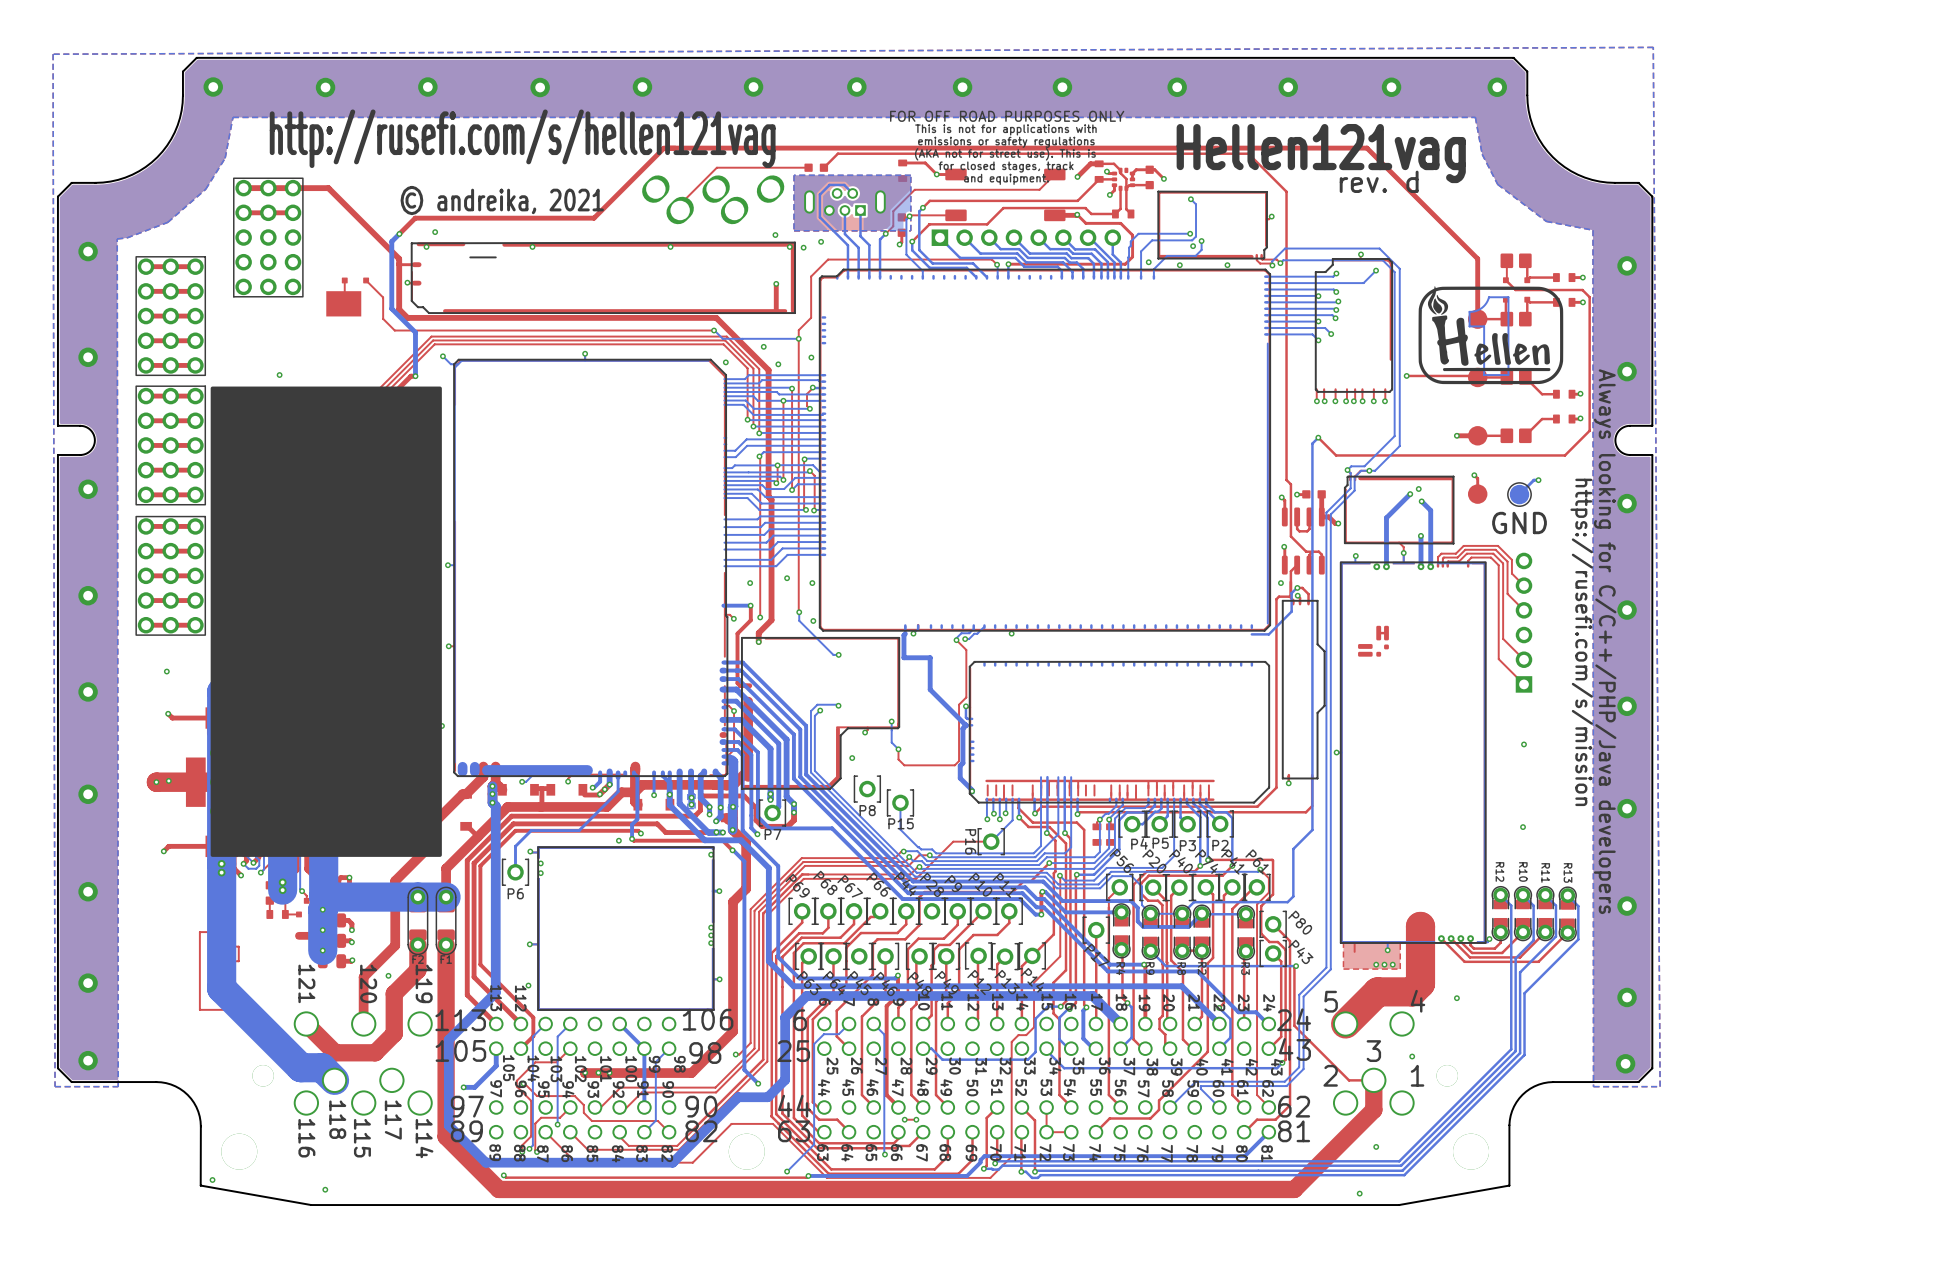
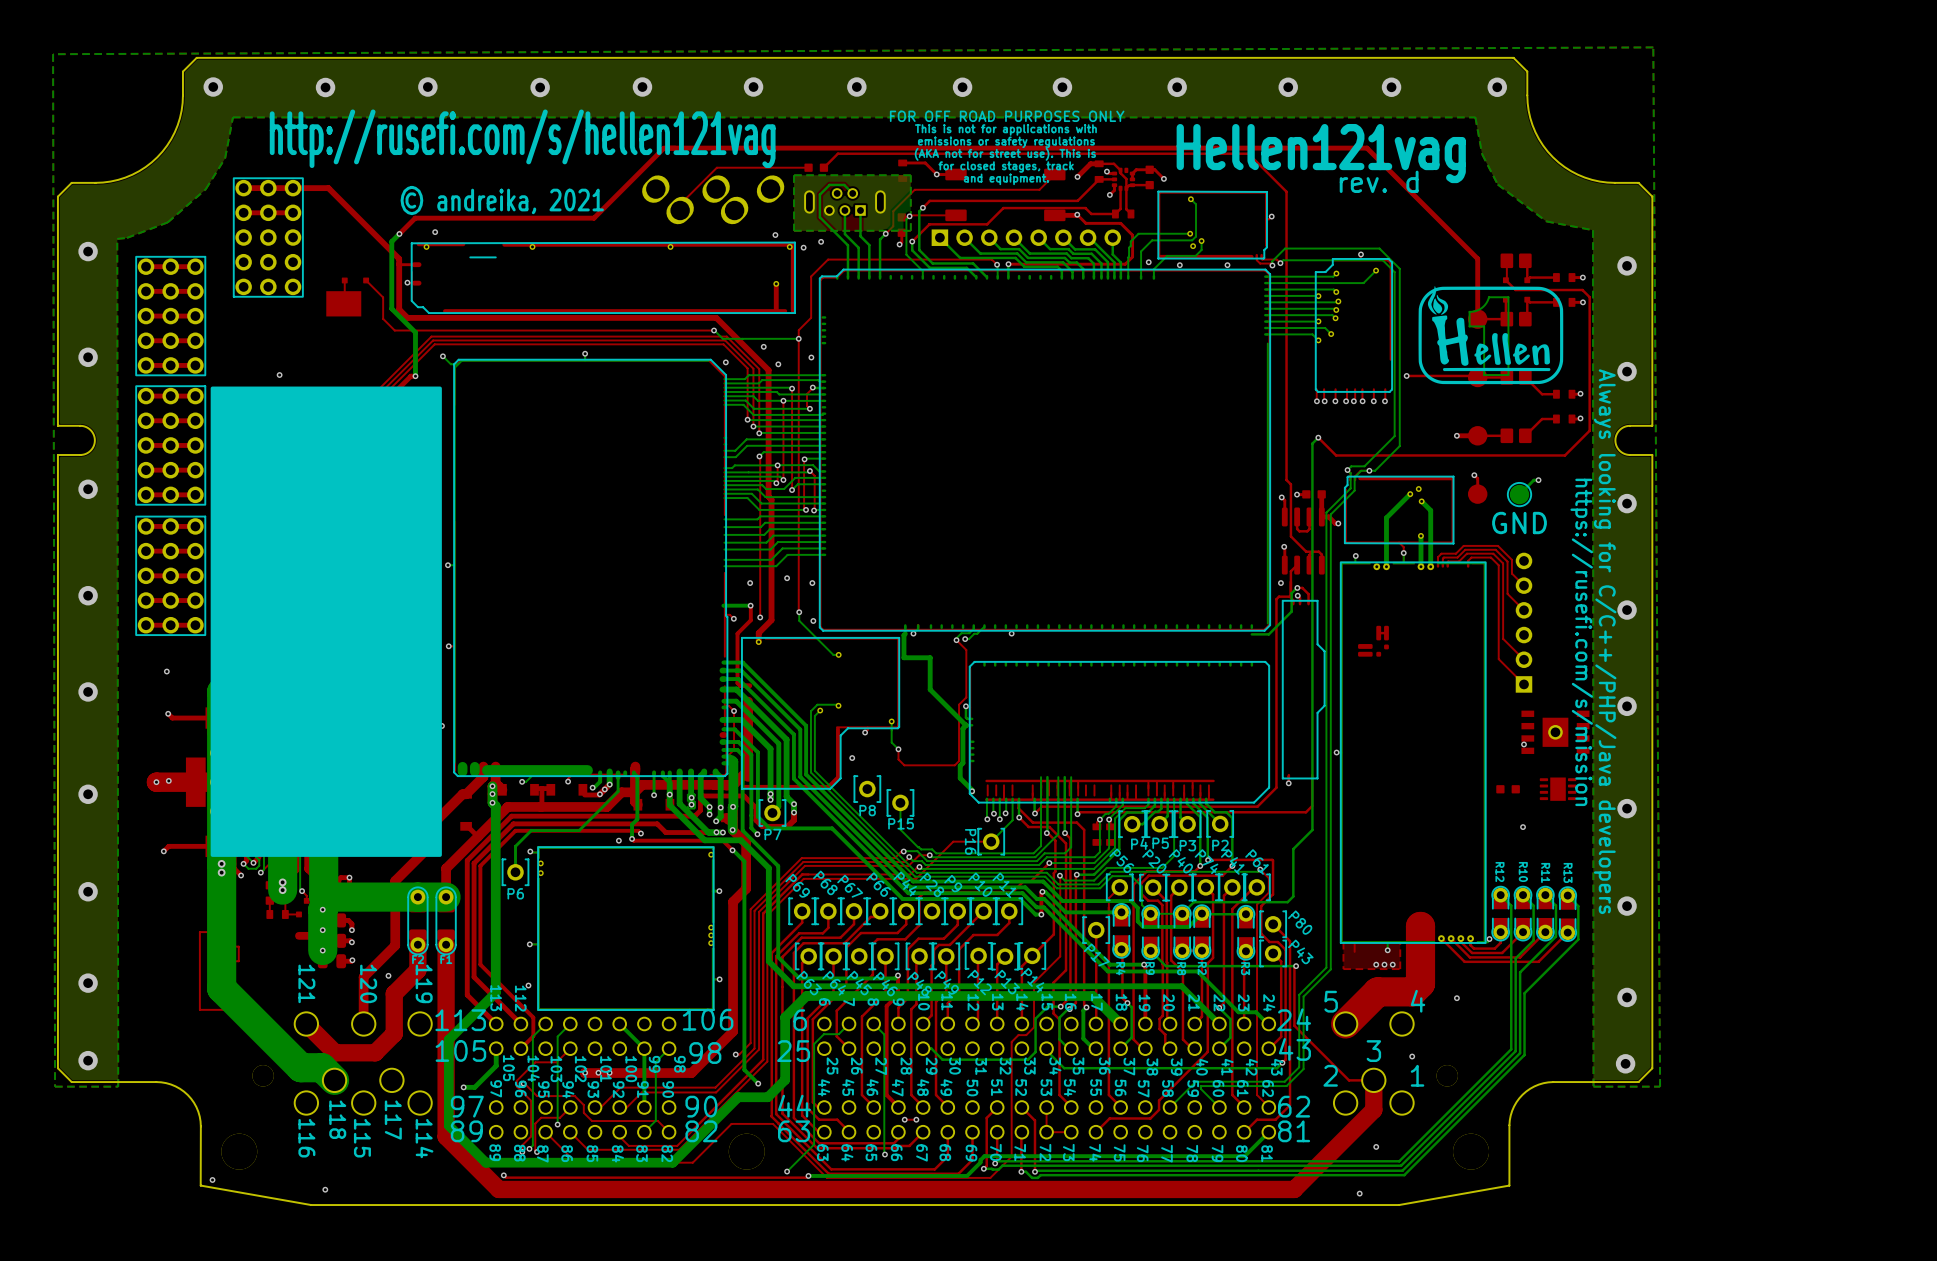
part: none -> (1555, 732)
part: none -> (1508, 789)
part: none -> (1558, 789)

